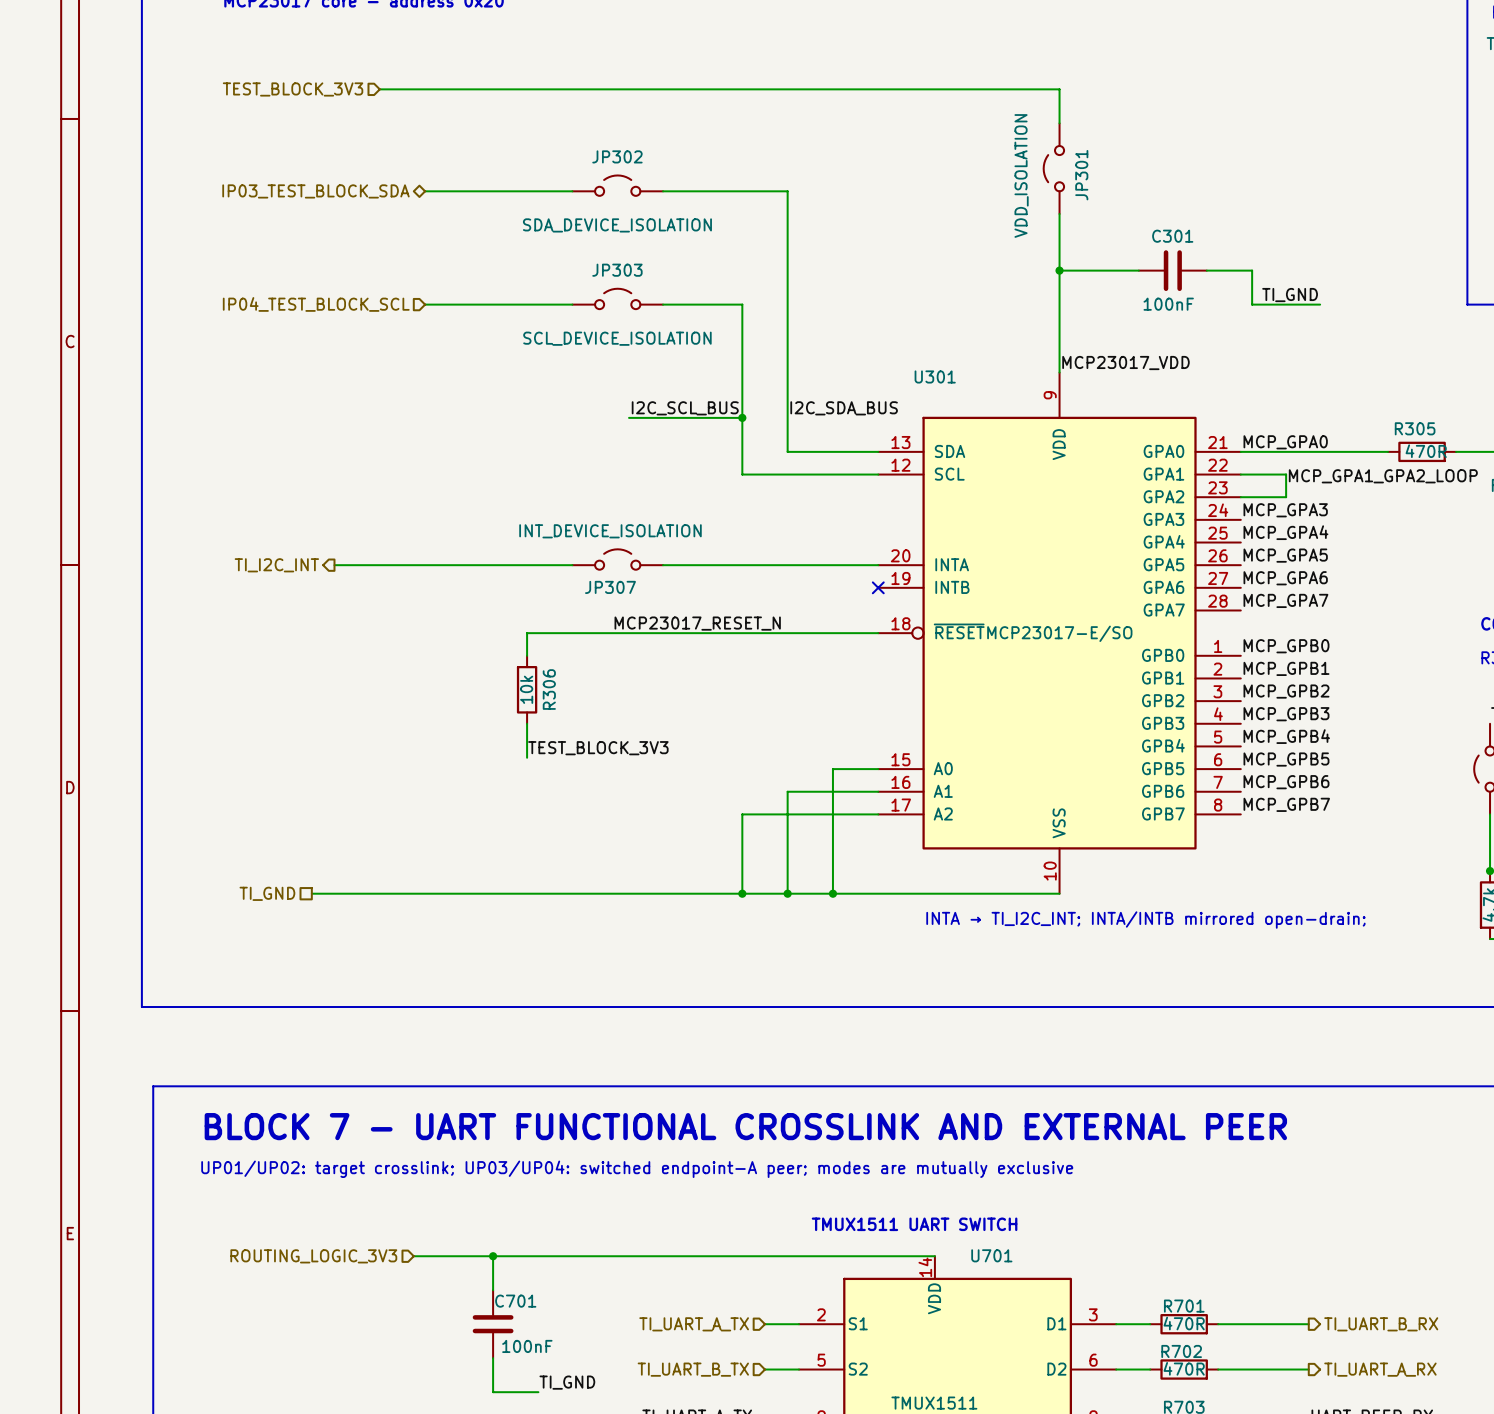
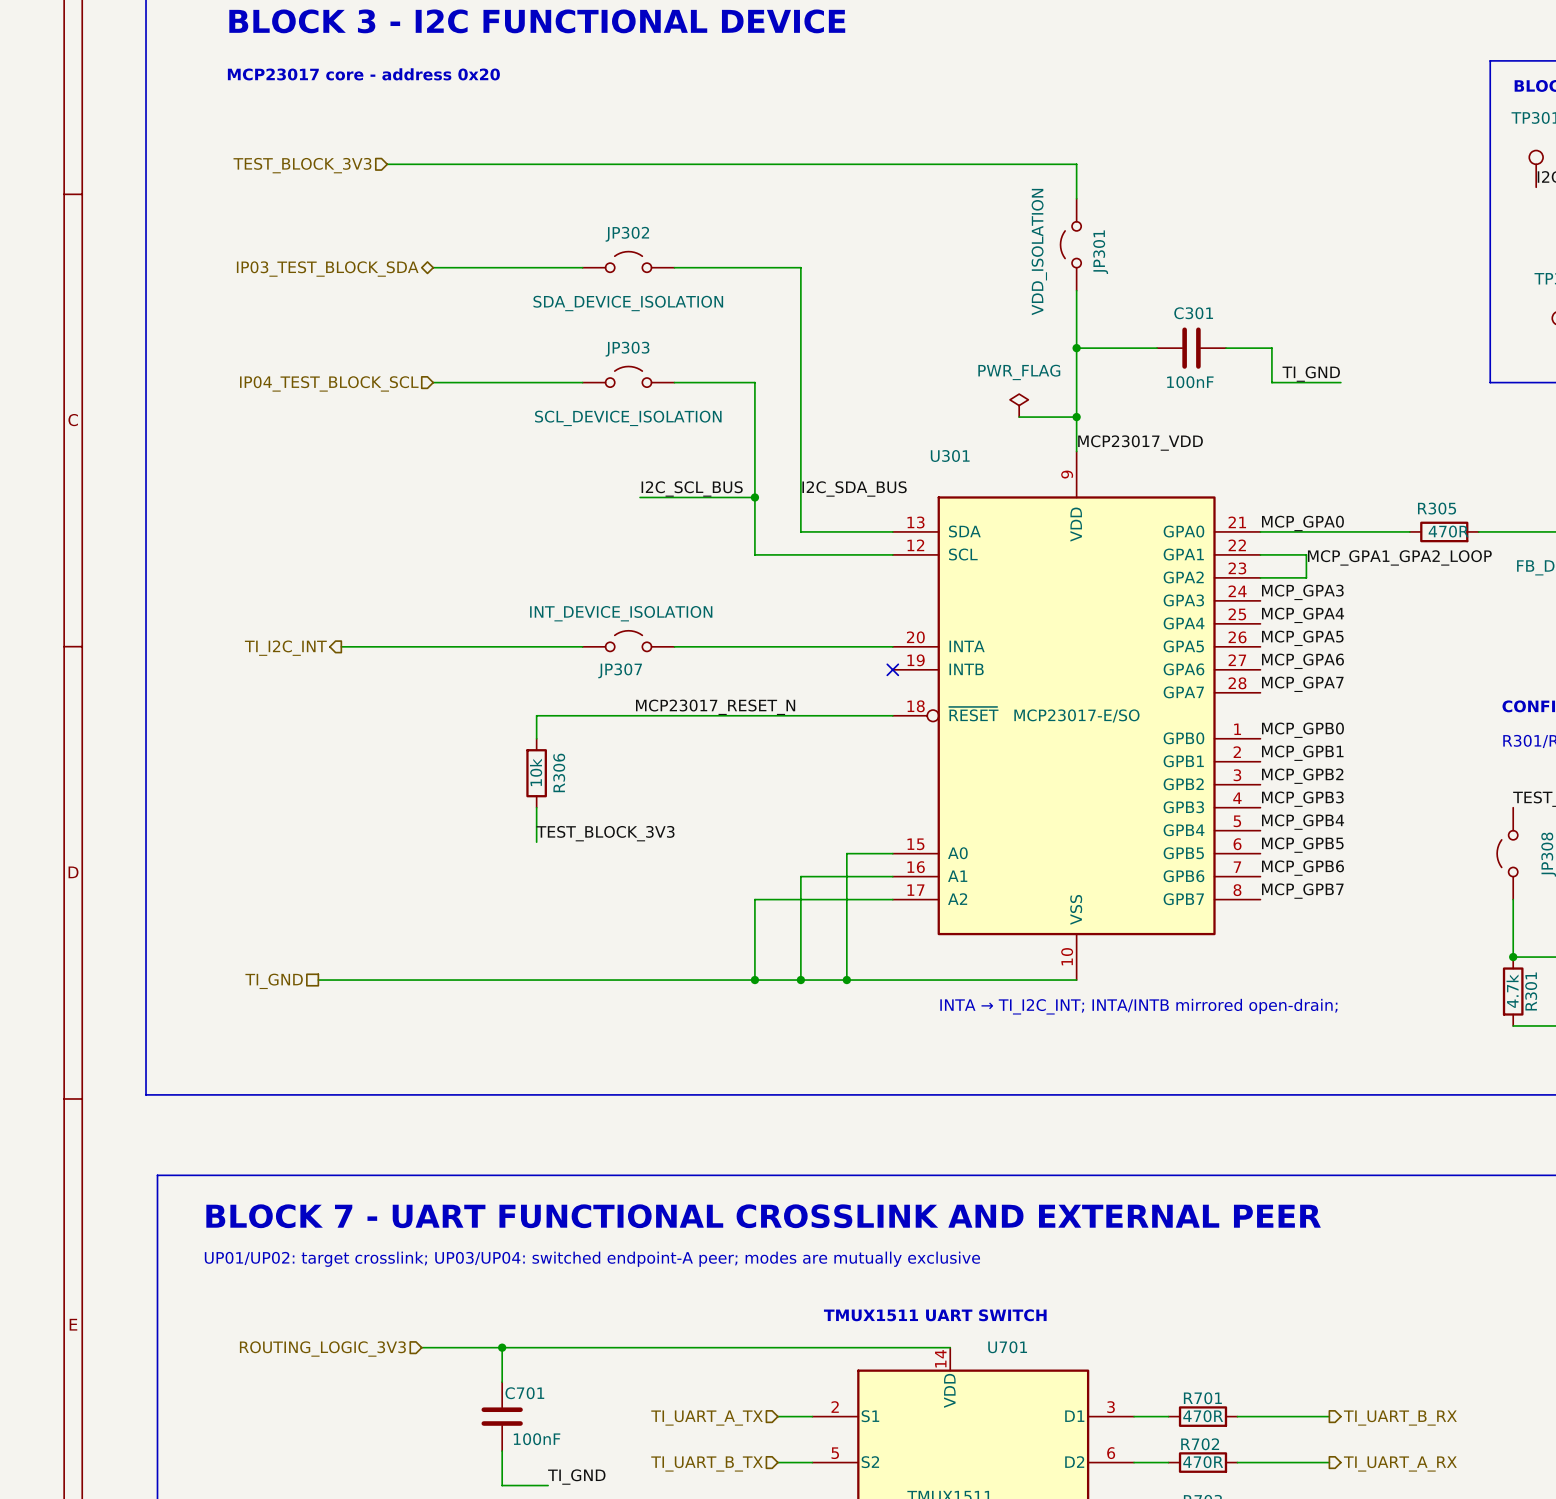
power symbol: none -> PWR_FLAG (1019, 405)
wire: none -> (1019, 417) (1076, 417)
junction: none -> (1076, 417)

